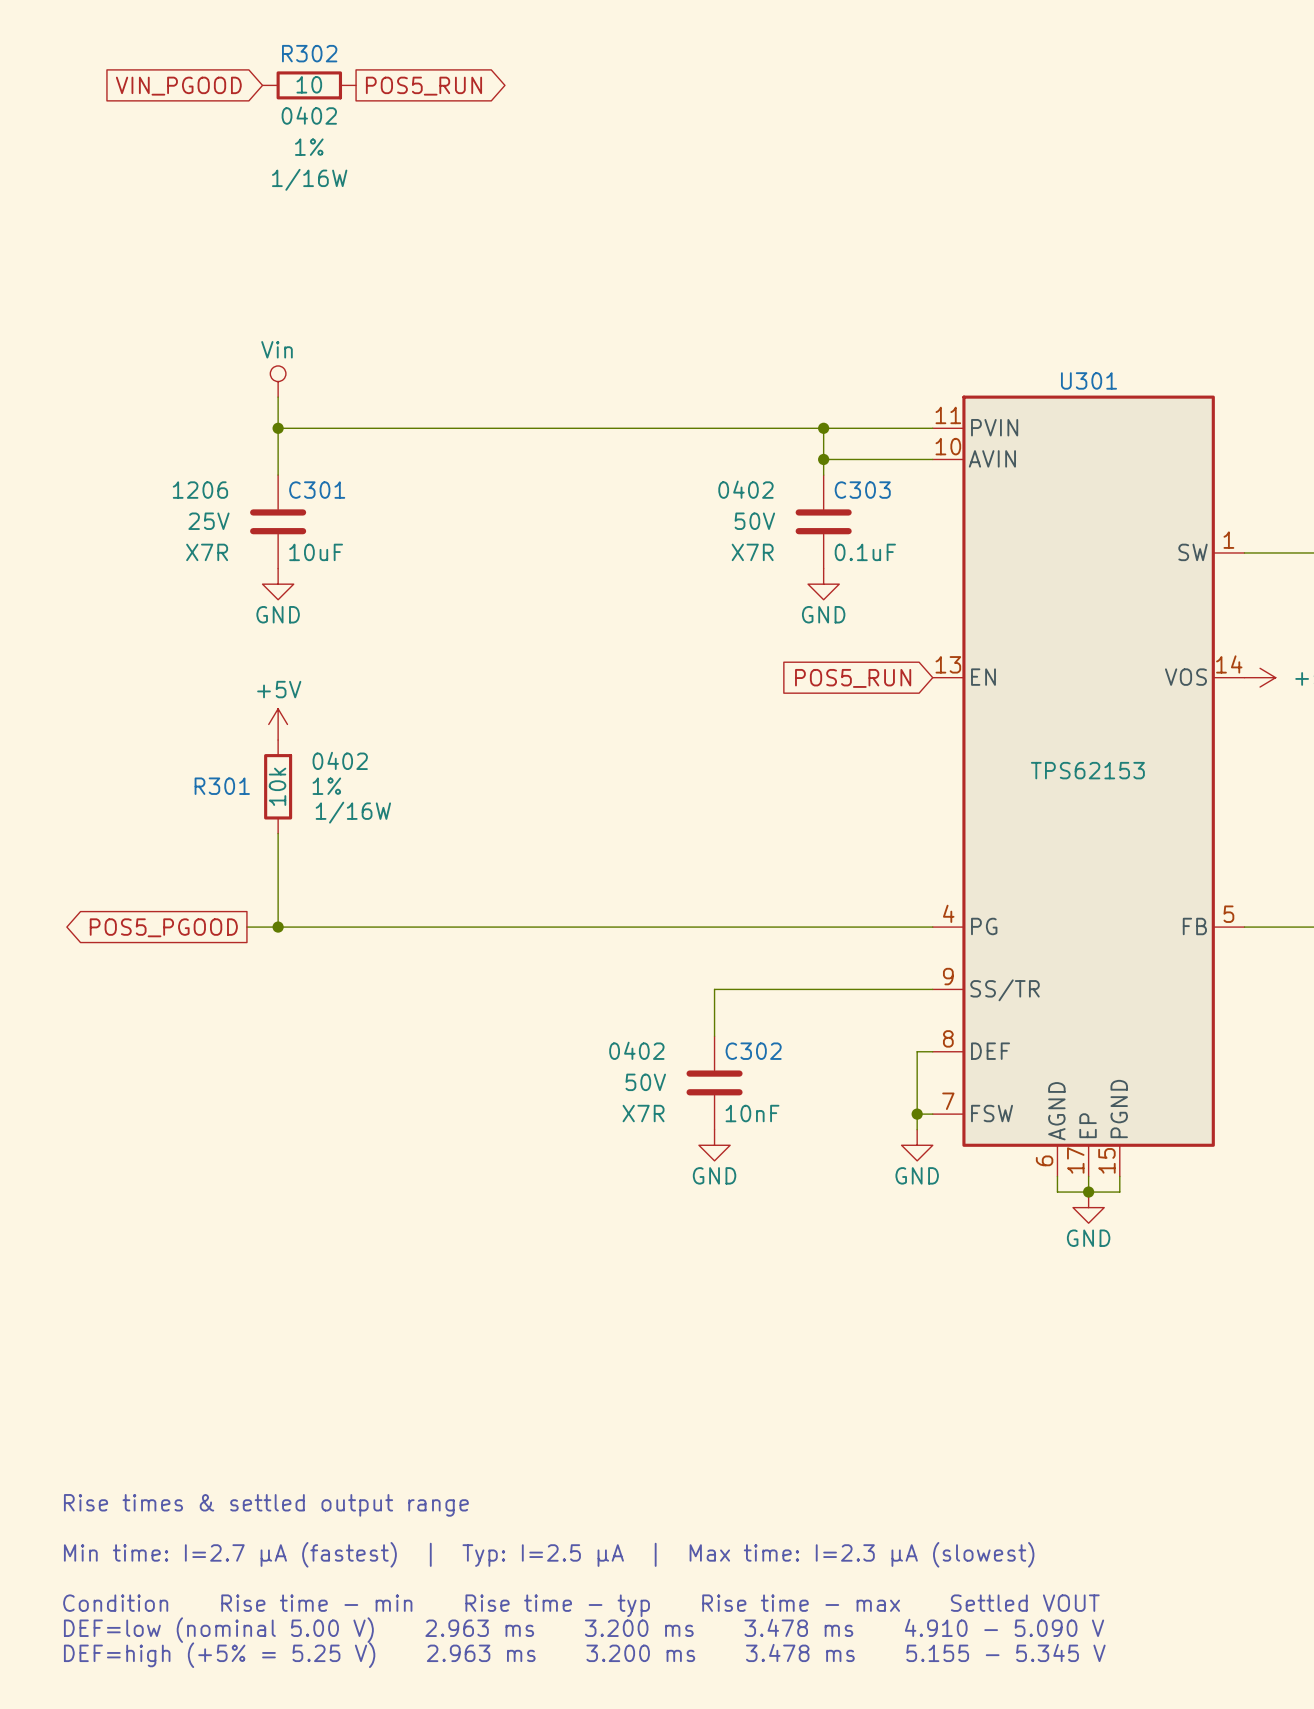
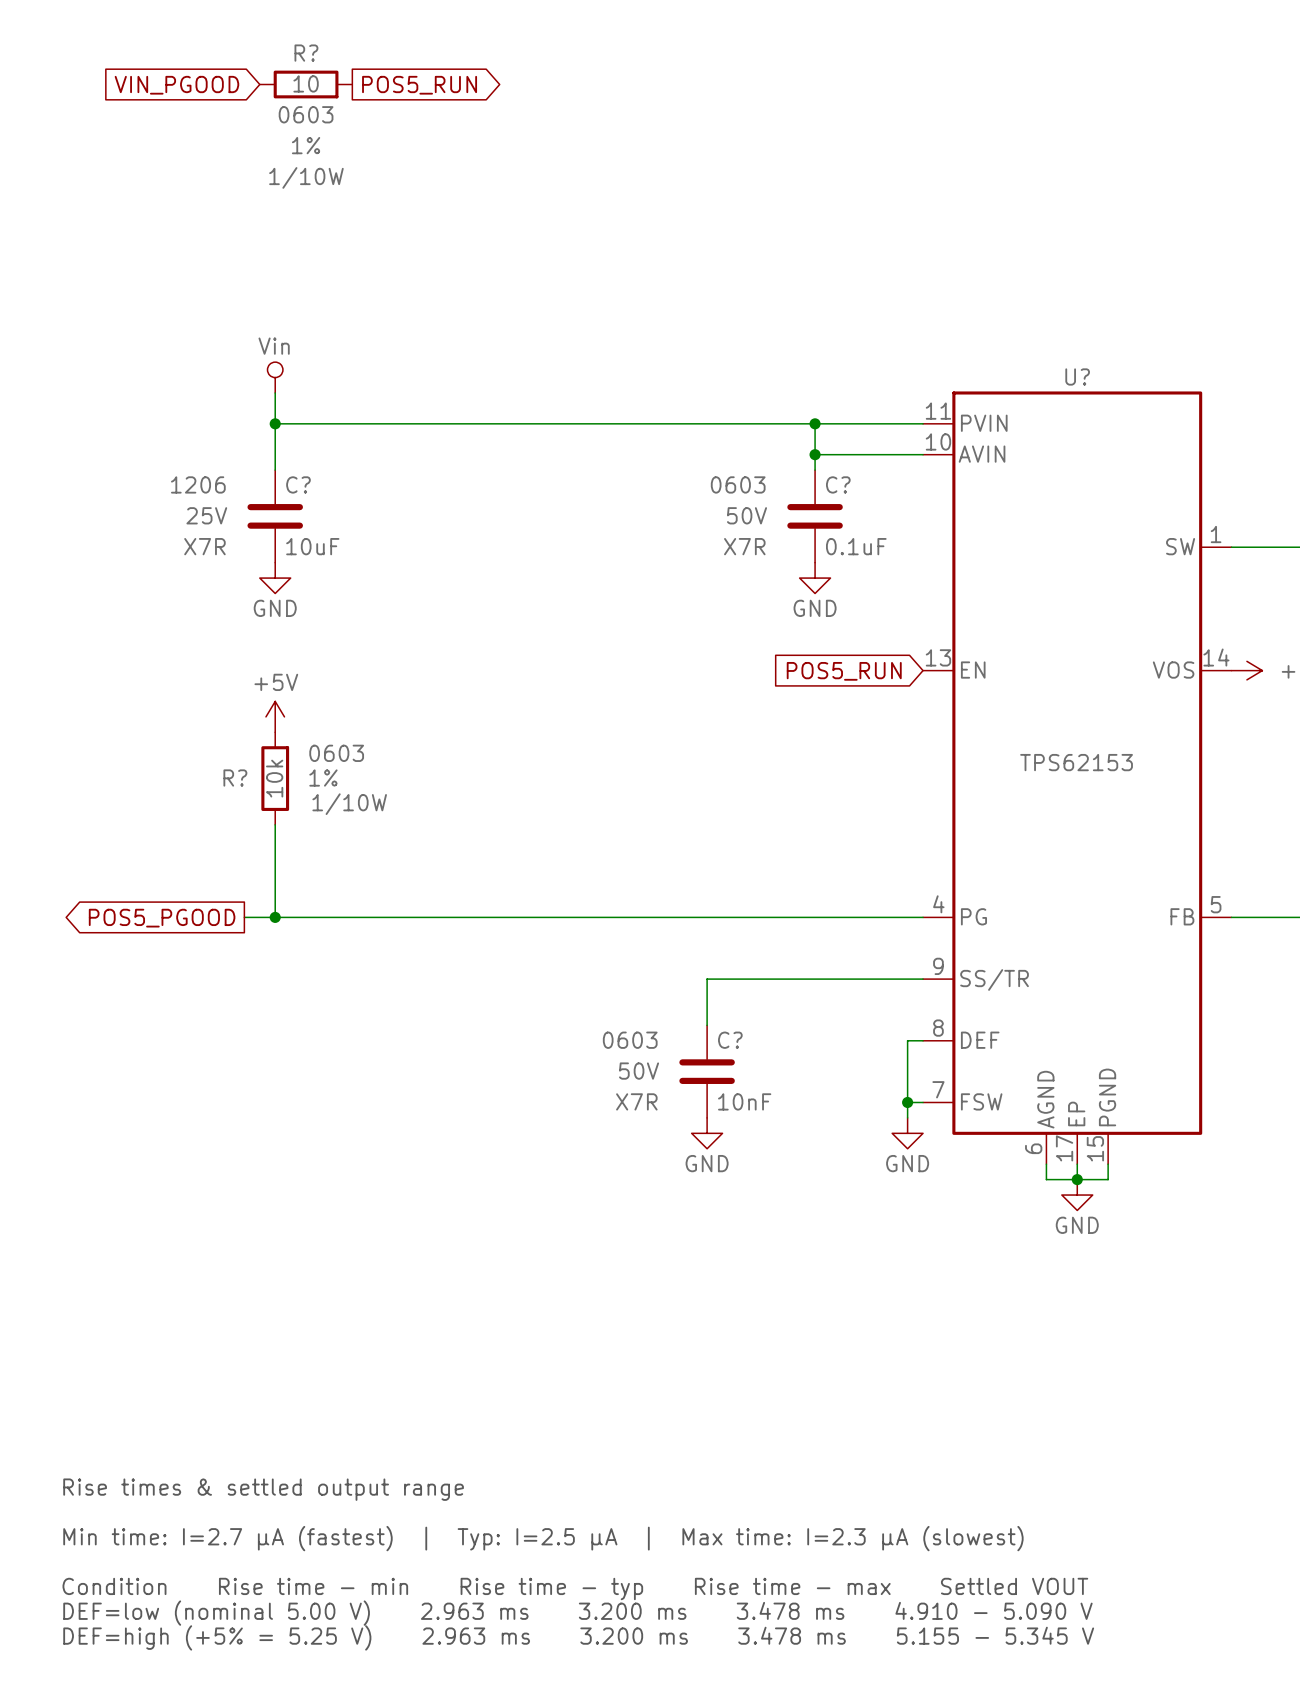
R302 name: R302 (309, 53) -> R? (306, 53)
R302 text: 0402 (309, 115) -> 0603 (306, 114)
R302 text: 1/16W (309, 179) -> 1/10W (306, 177)
U301 name: U301 (1088, 380) -> U? (1077, 376)
C303 text: 0402 (745, 489) -> 0603 (738, 484)
C301 name: C301 (317, 490) -> C? (298, 484)
C303 name: C303 (862, 490) -> C? (838, 484)
R301 text: 0402 (340, 760) -> 0603 (336, 753)
R301 name: R301 (222, 786) -> R? (235, 778)
R301 text: 1/16W (353, 812) -> 1/10W (349, 804)
C302 text: 0402 (636, 1050) -> 0603 (630, 1040)
C302 name: C302 (753, 1051) -> C? (730, 1040)

